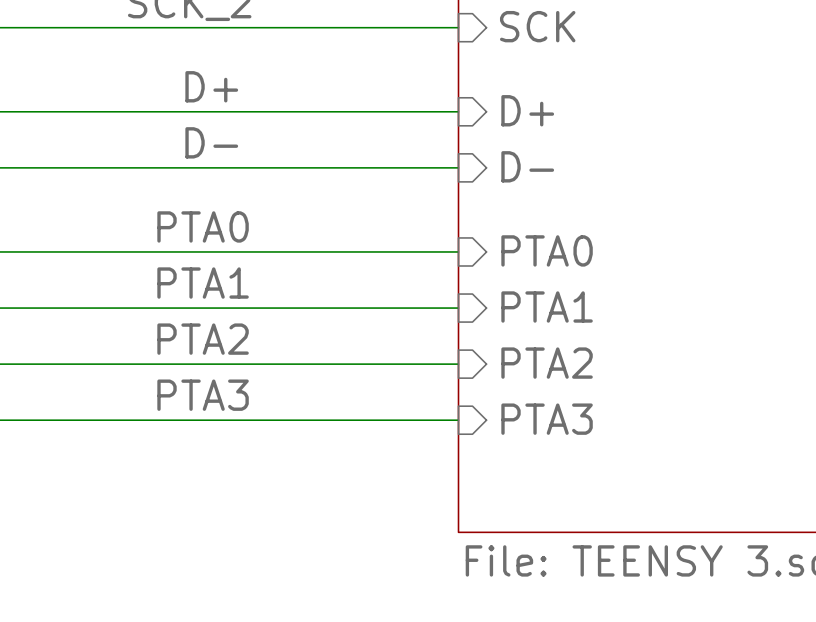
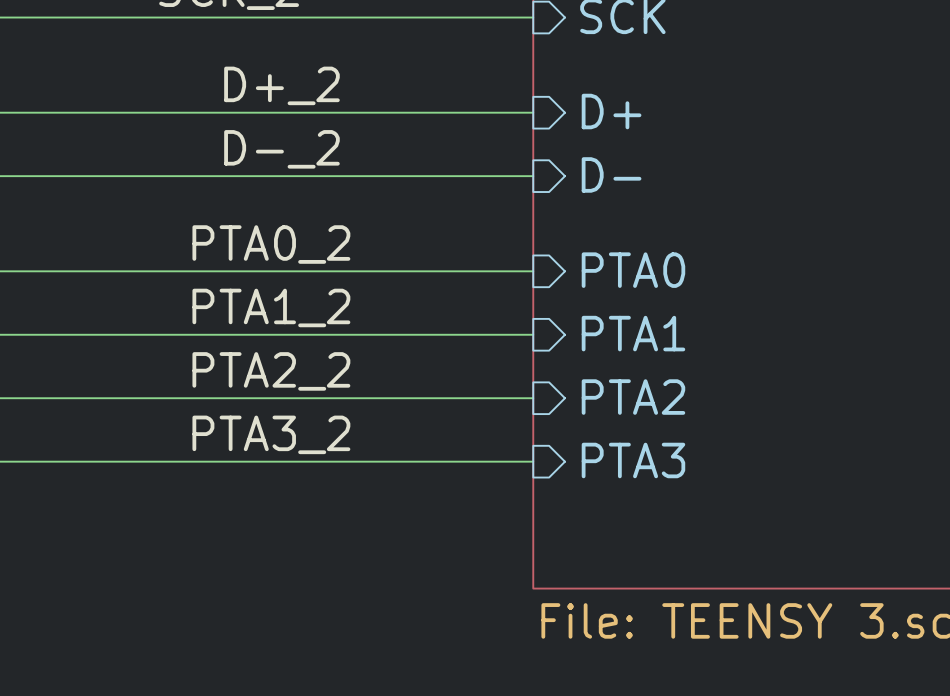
label: D+ (211, 86) -> D+_2 (281, 85)
label: D- (211, 142) -> D-_2 (281, 149)
label: PTA0 (203, 226) -> PTA0_2 (271, 244)
label: PTA1 (203, 283) -> PTA1_2 (271, 307)
label: PTA2 (203, 339) -> PTA2_2 (271, 371)
label: PTA3 (203, 395) -> PTA3_2 (271, 434)

